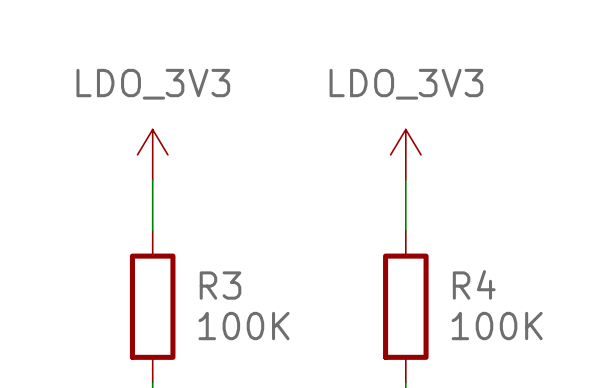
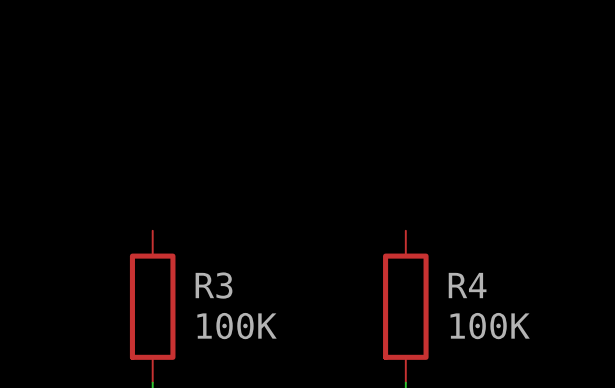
power symbol: LDO_3V3 (152, 154) -> none
power symbol: LDO_3V3 (405, 154) -> none
wire: (152, 180) (152, 230) -> none
wire: (405, 180) (405, 230) -> none

